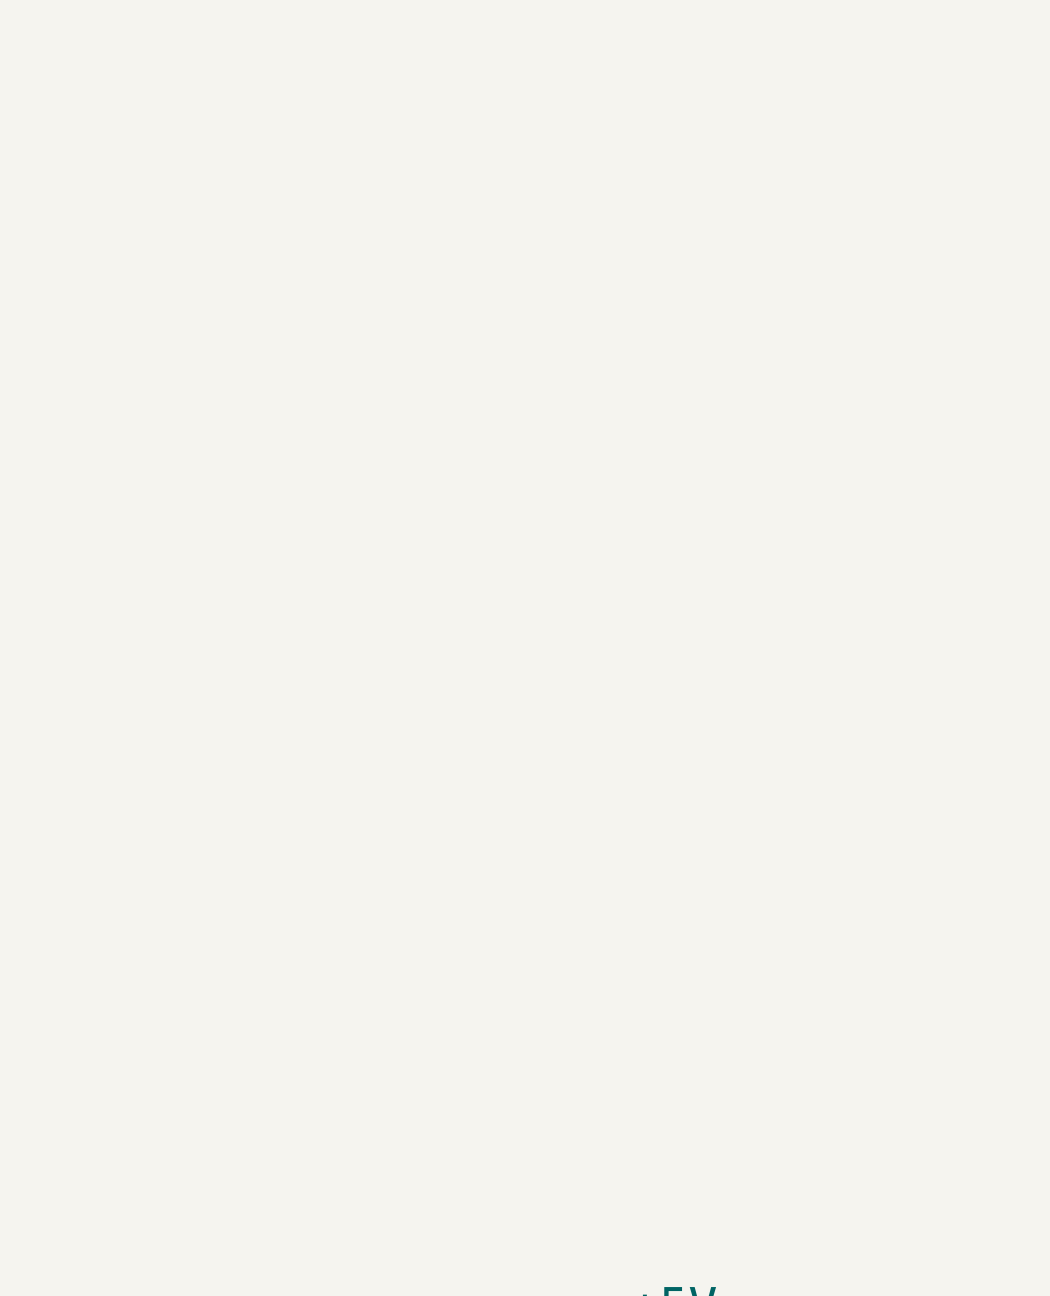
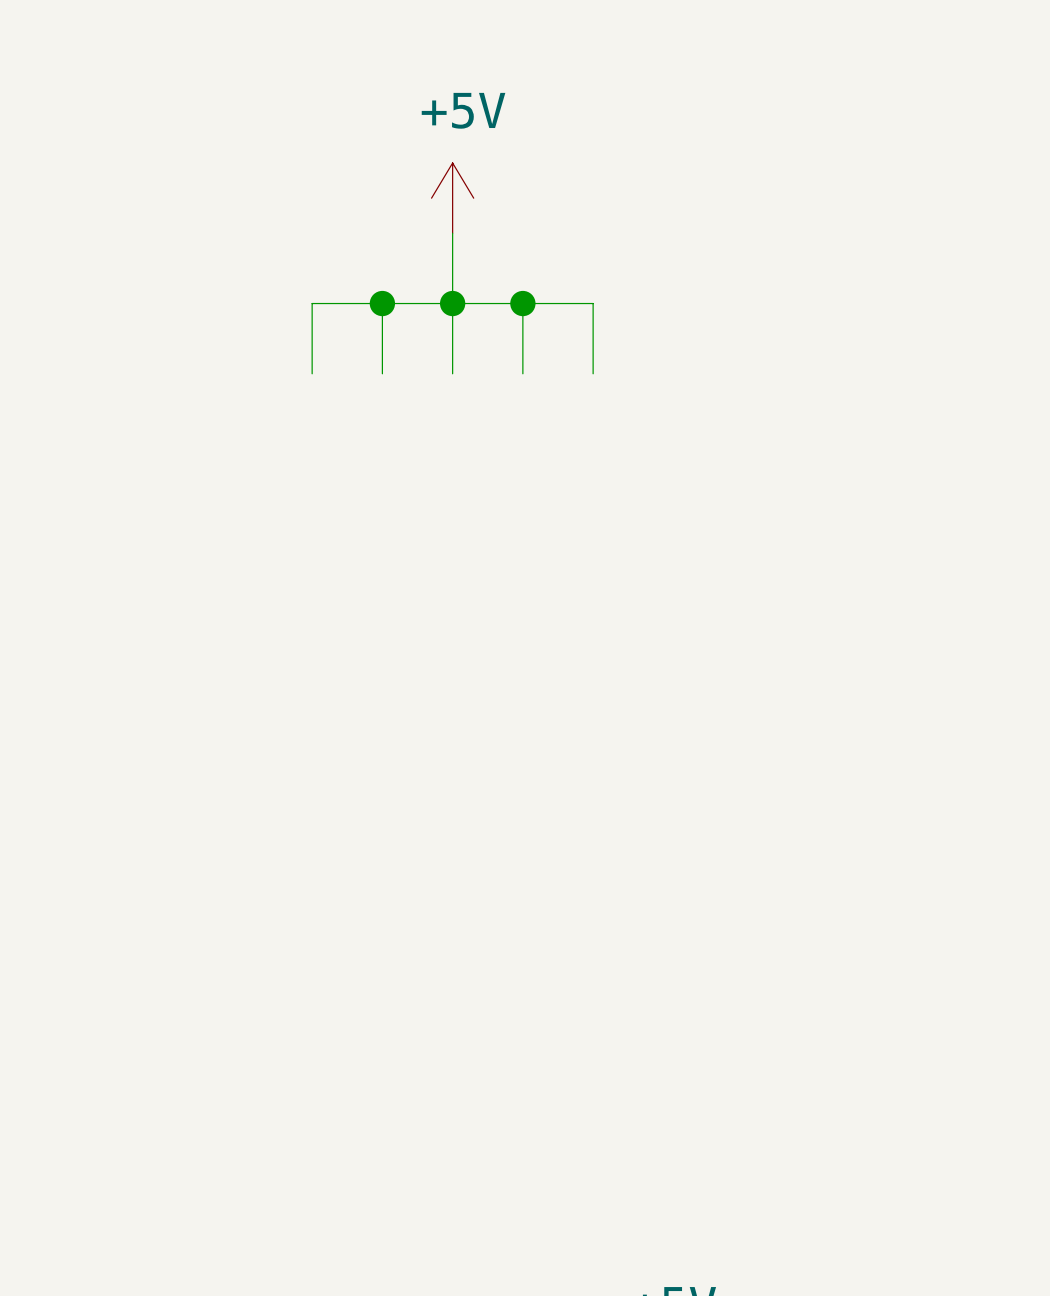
power symbol: none -> +5V (452, 198)
wire: none -> (452, 233) (452, 373)
wire: none -> (382, 303) (382, 373)
junction: none -> (382, 303)
junction: none -> (452, 303)
wire: none -> (522, 303) (522, 373)
junction: none -> (522, 303)
wire: none -> (312, 373) (312, 303) (593, 303) (593, 373)

